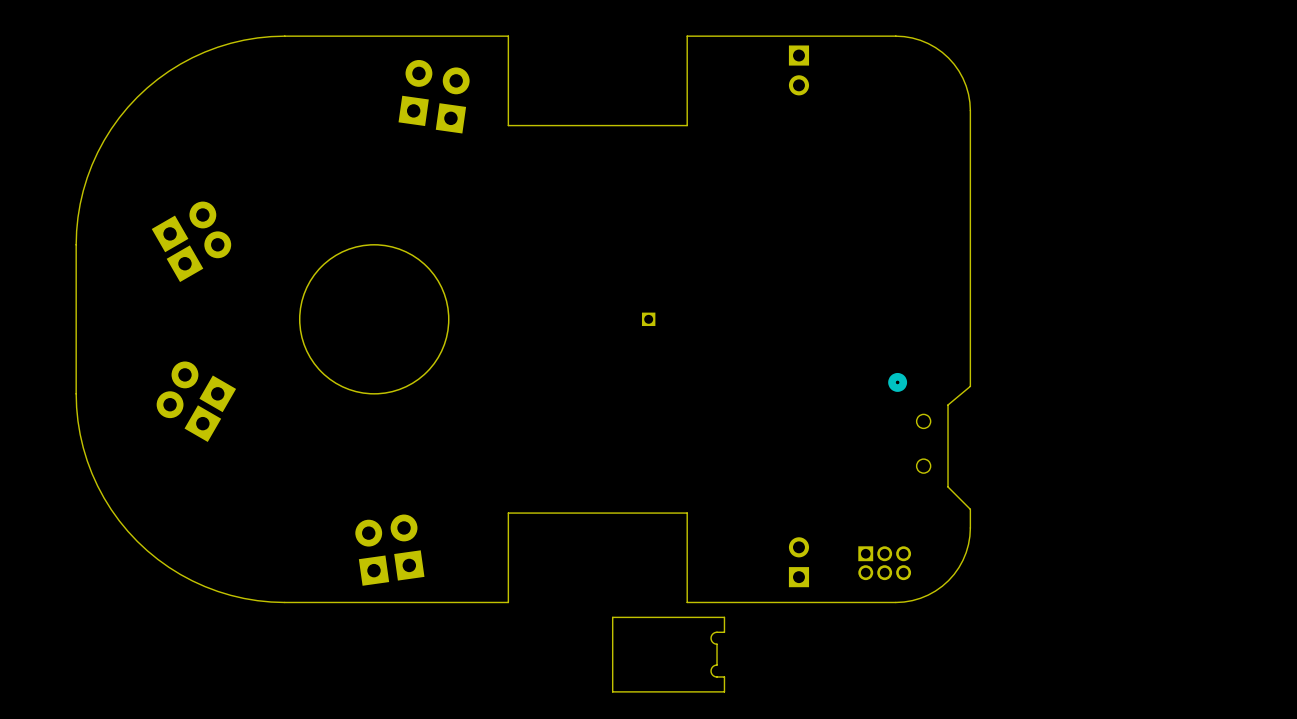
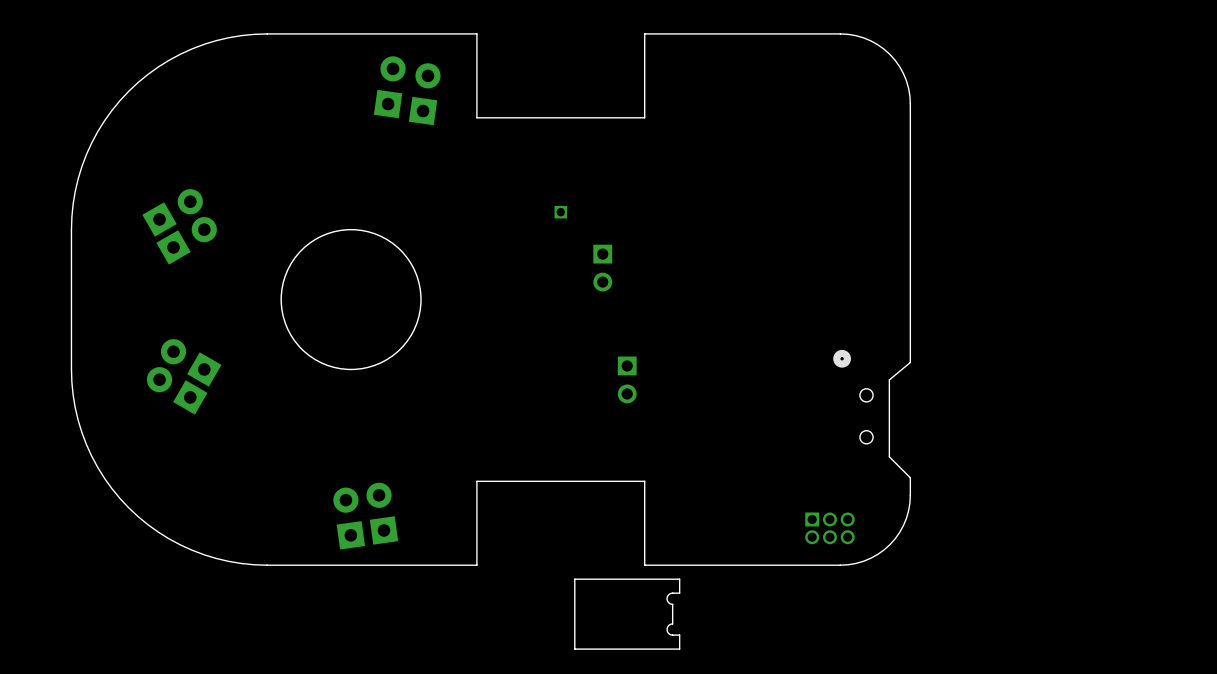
part: (798, 70) -> none
part: none -> (602, 268)
part position: (648, 319) -> (560, 212)
part: none -> (627, 379)
part: (798, 562) -> none

